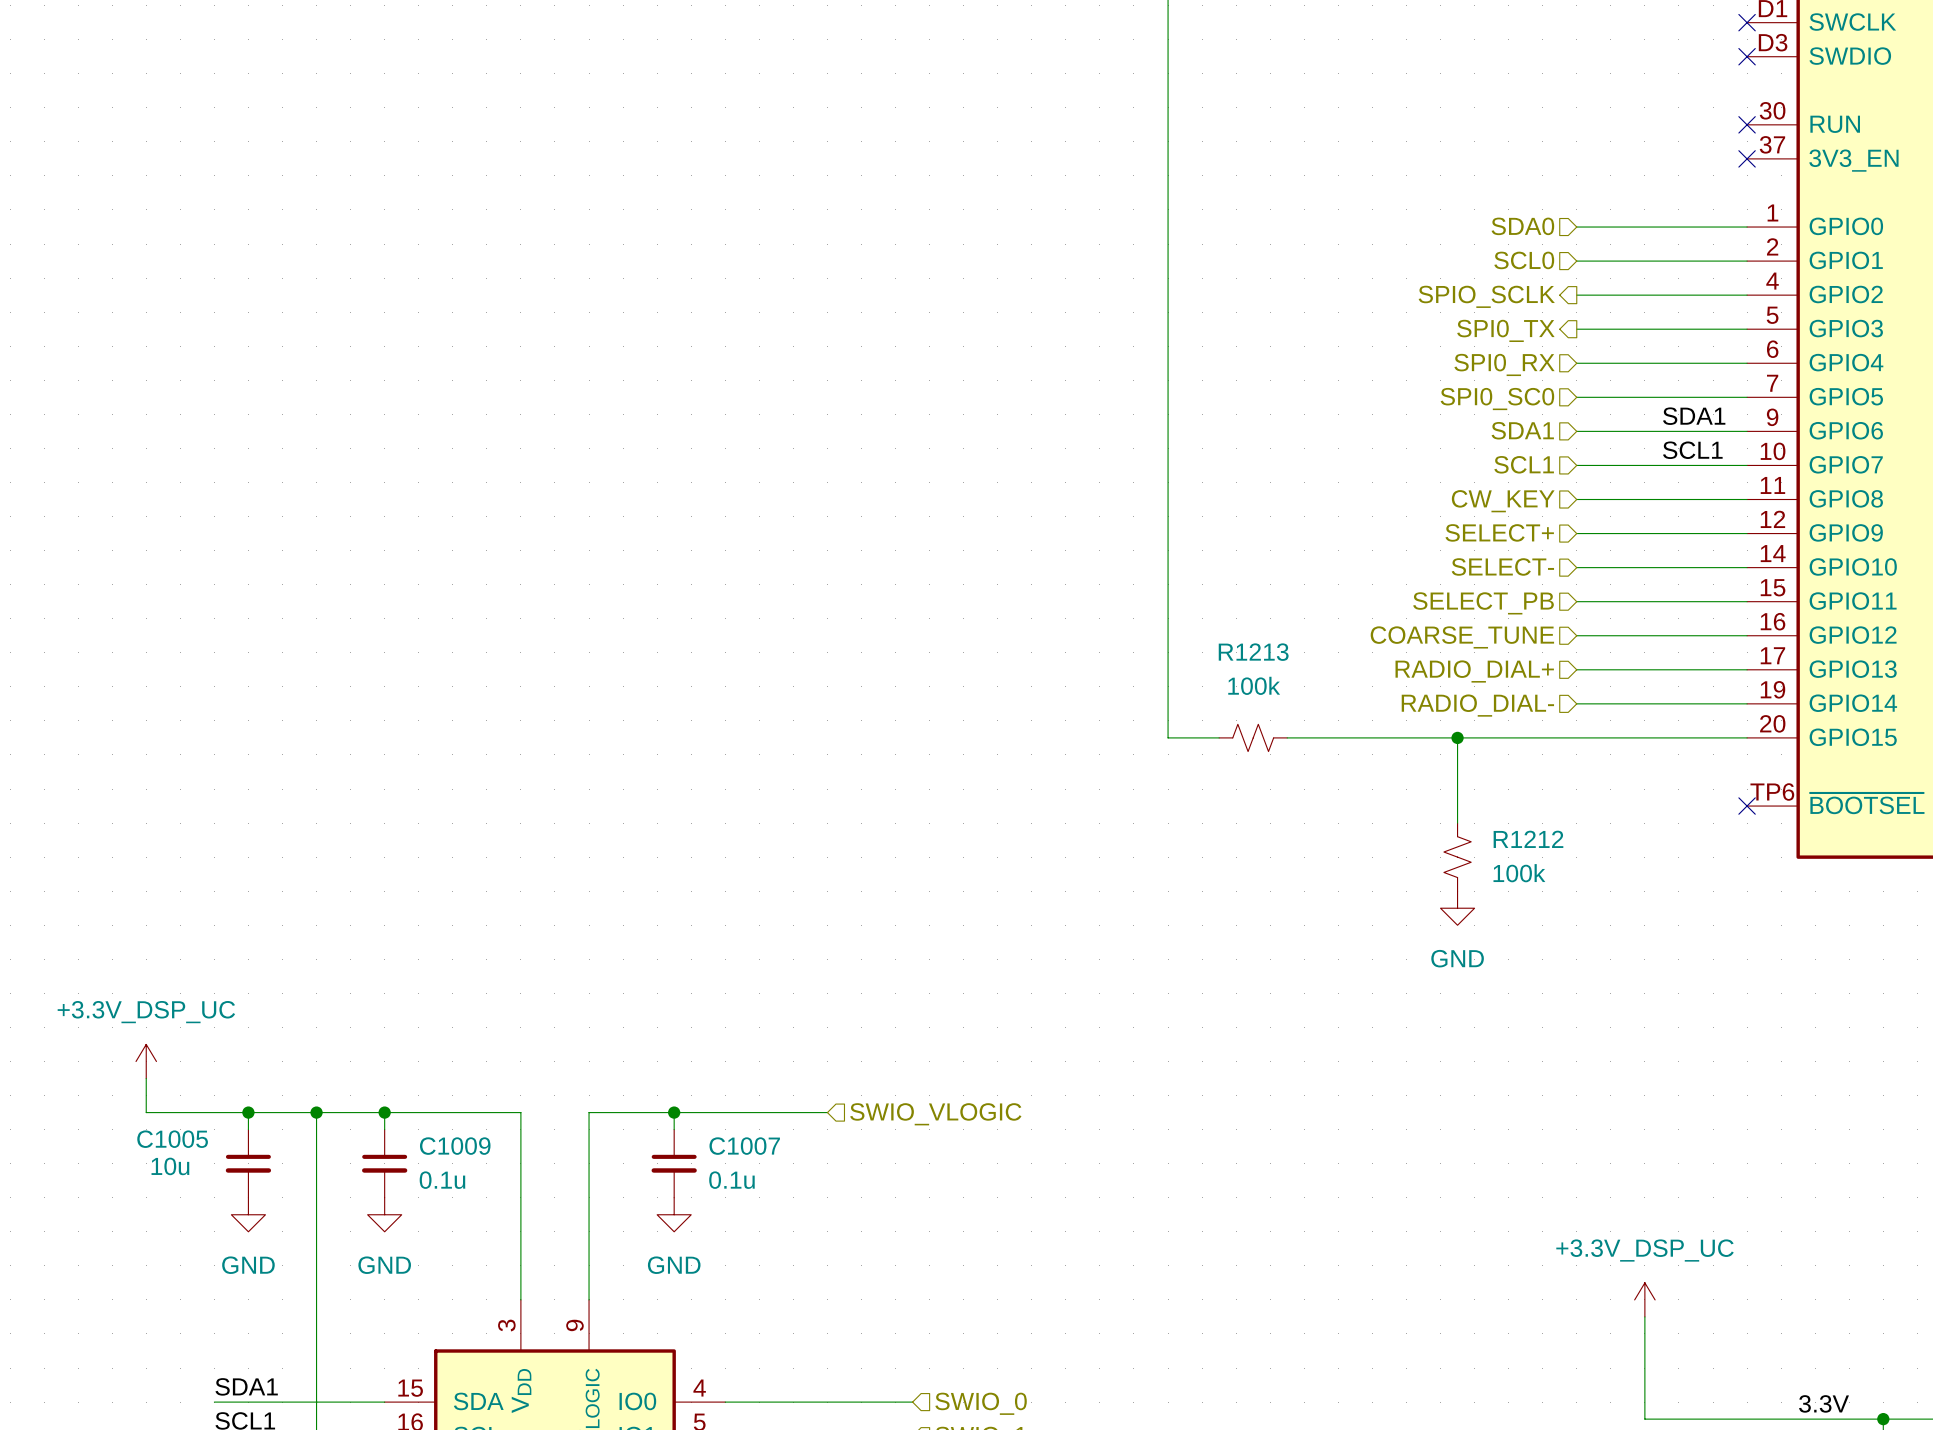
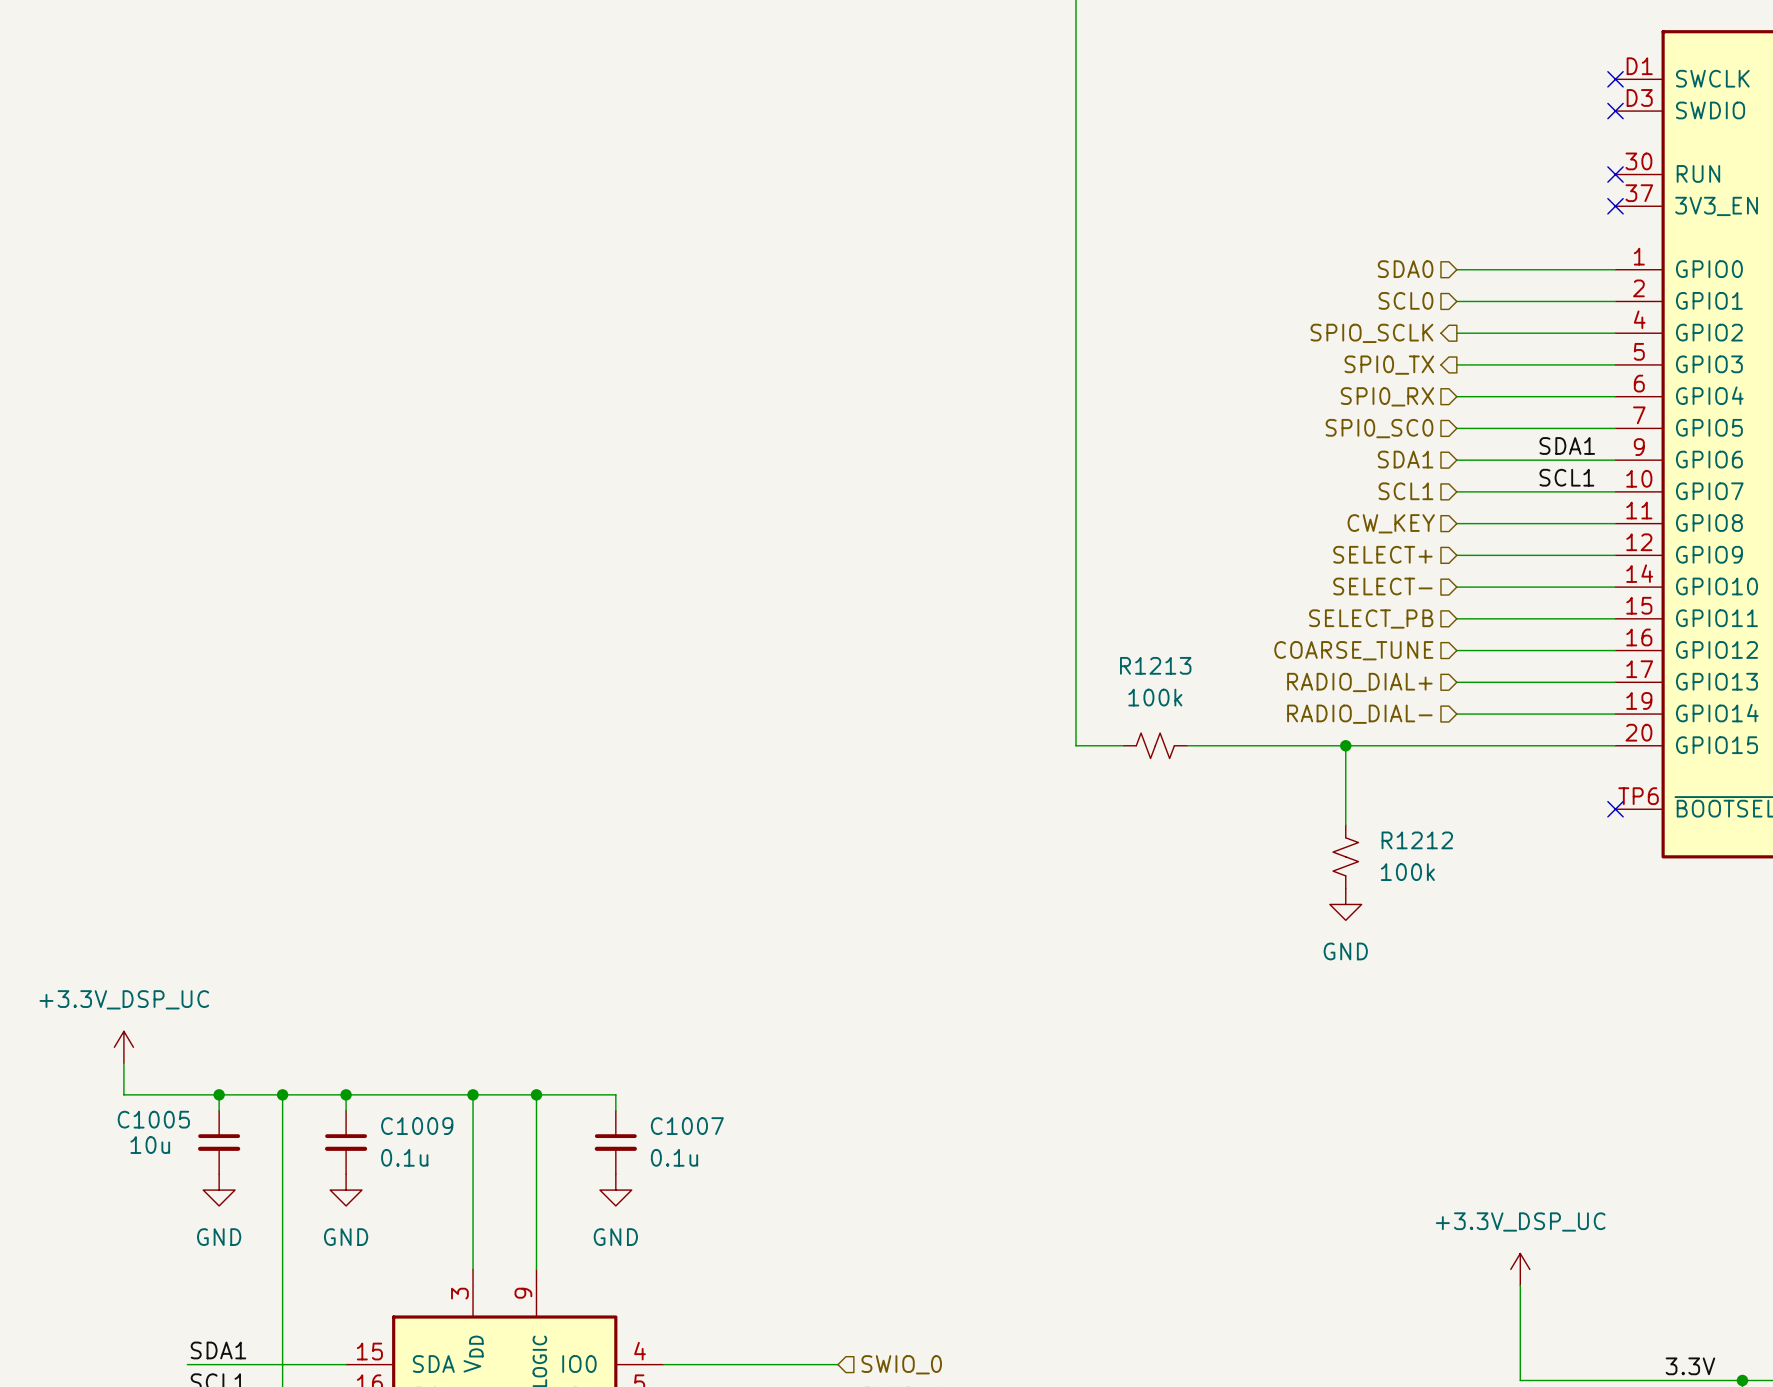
wire: none -> (473, 1094) (536, 1094)
junction: none -> (473, 1094)
junction: none -> (536, 1094)
wire: (674, 1112) (827, 1112) -> none
junction: (674, 1112) -> none
hierarchical label: SWIO_VLOGIC (935, 1114) -> none

